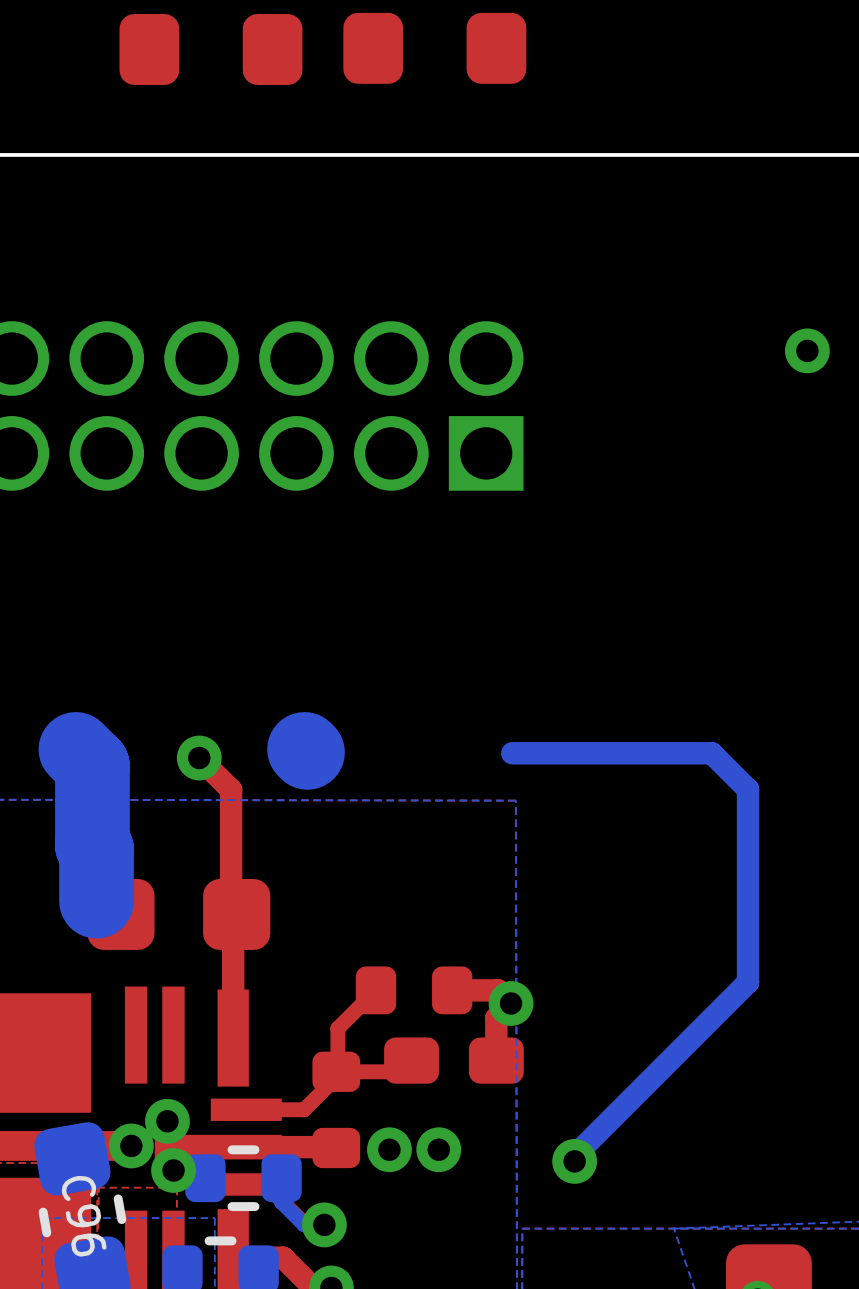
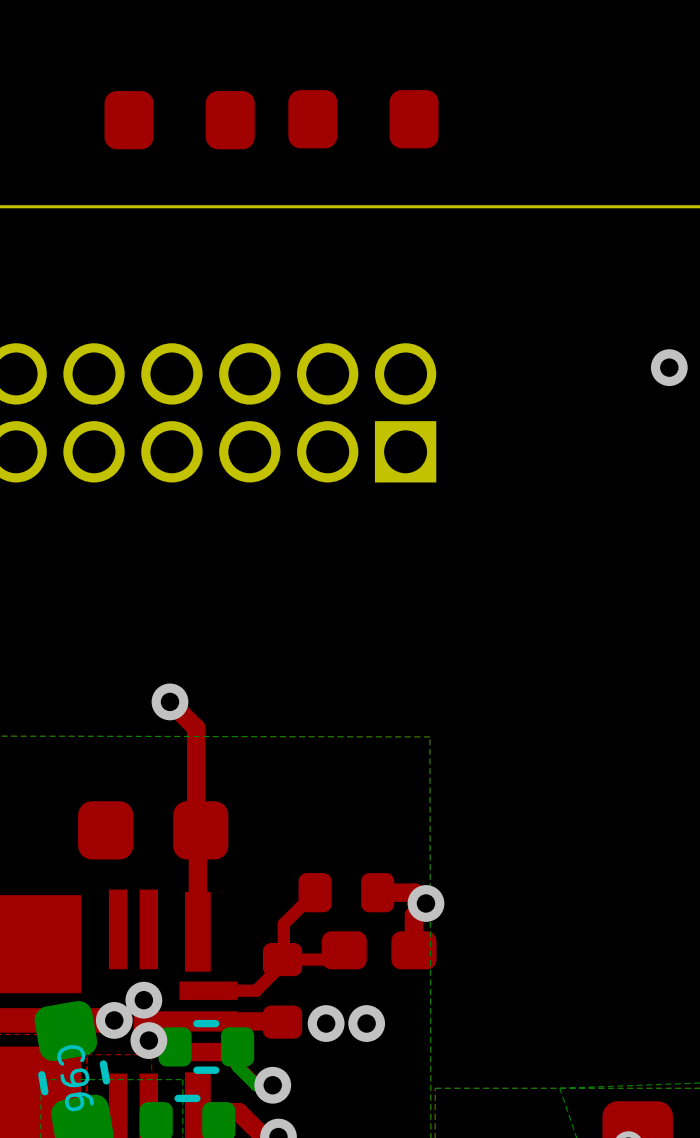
bottom track: (75, 749) (92, 765) (92, 845) (96, 849) (96, 901) -> none
bottom track: (304, 749) (307, 752) -> none
bottom track: (512, 753) (711, 753) (748, 789) (748, 982) (574, 1155) (574, 1161) -> none
via: (574, 1161) -> none

